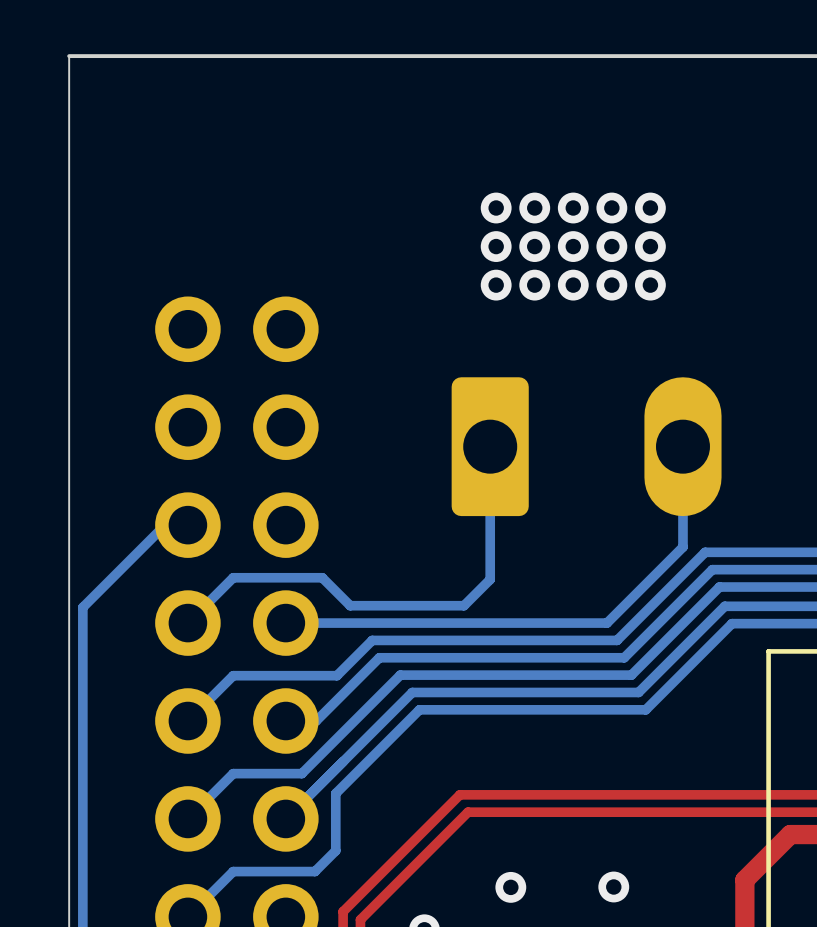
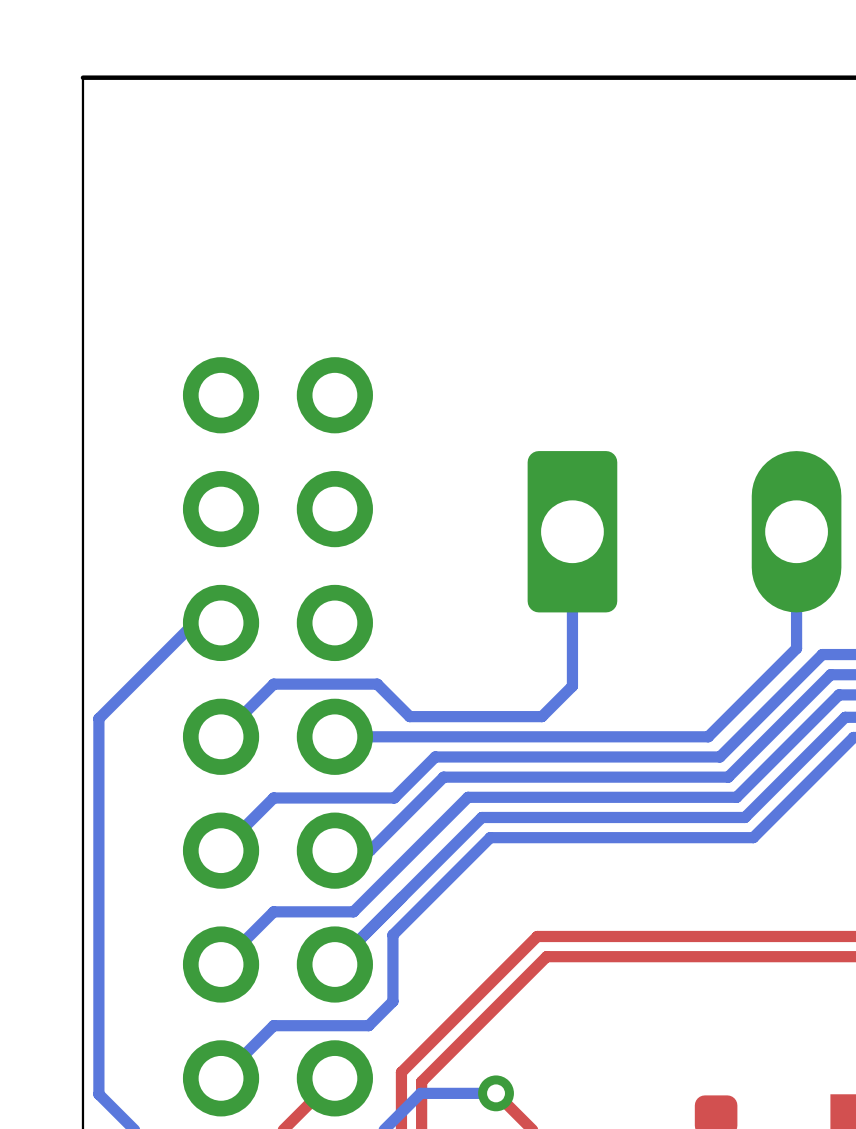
via: (496, 208) -> none
via: (534, 208) -> none
via: (573, 208) -> none
via: (611, 208) -> none
via: (650, 208) -> none
via: (496, 246) -> none
via: (534, 246) -> none
via: (573, 246) -> none
via: (611, 246) -> none
via: (650, 246) -> none
via: (496, 285) -> none
via: (534, 285) -> none
via: (573, 285) -> none
via: (611, 285) -> none
via: (650, 285) -> none
via: (613, 886) -> none
via: (510, 887) -> none

